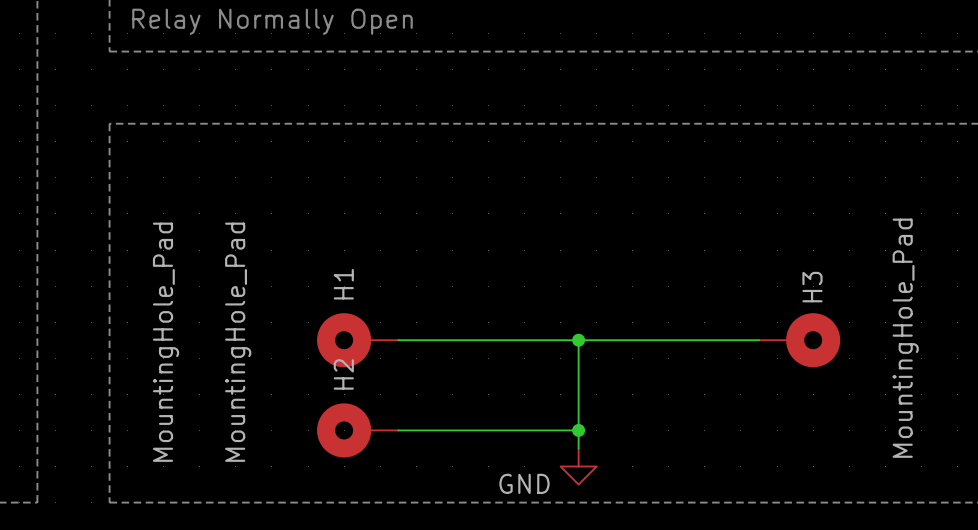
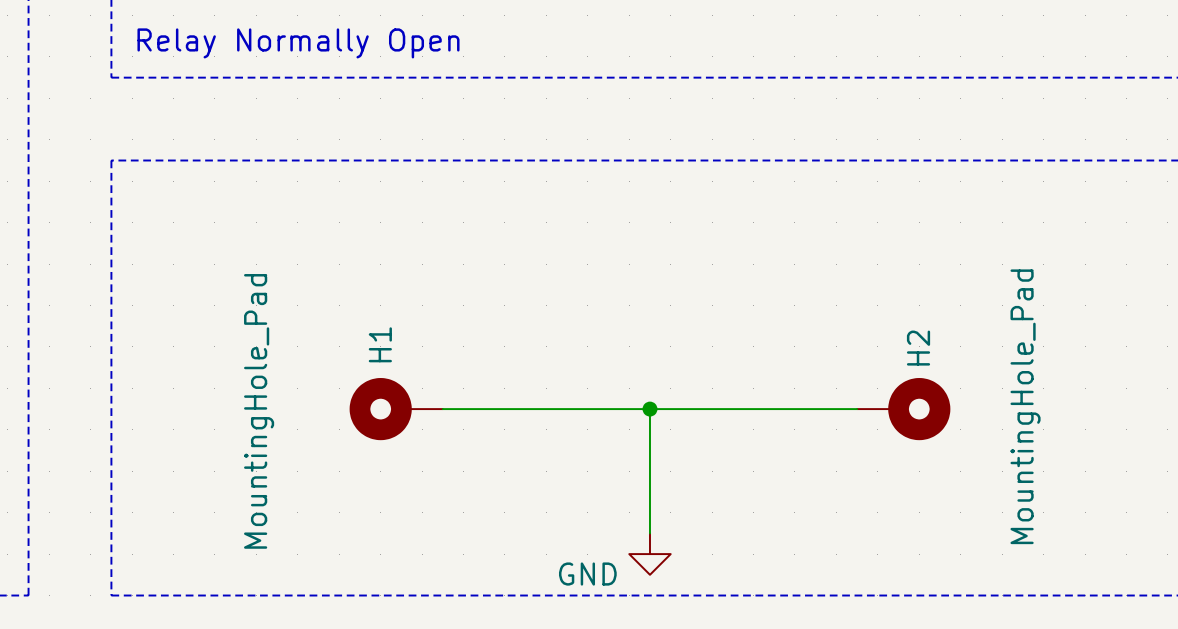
H3 name: H3 (812, 287) -> H2 (918, 348)
H2: MountingHole_Pad (357, 430) -> none
wire: (398, 430) (578, 430) -> none
junction: (578, 430) -> none

